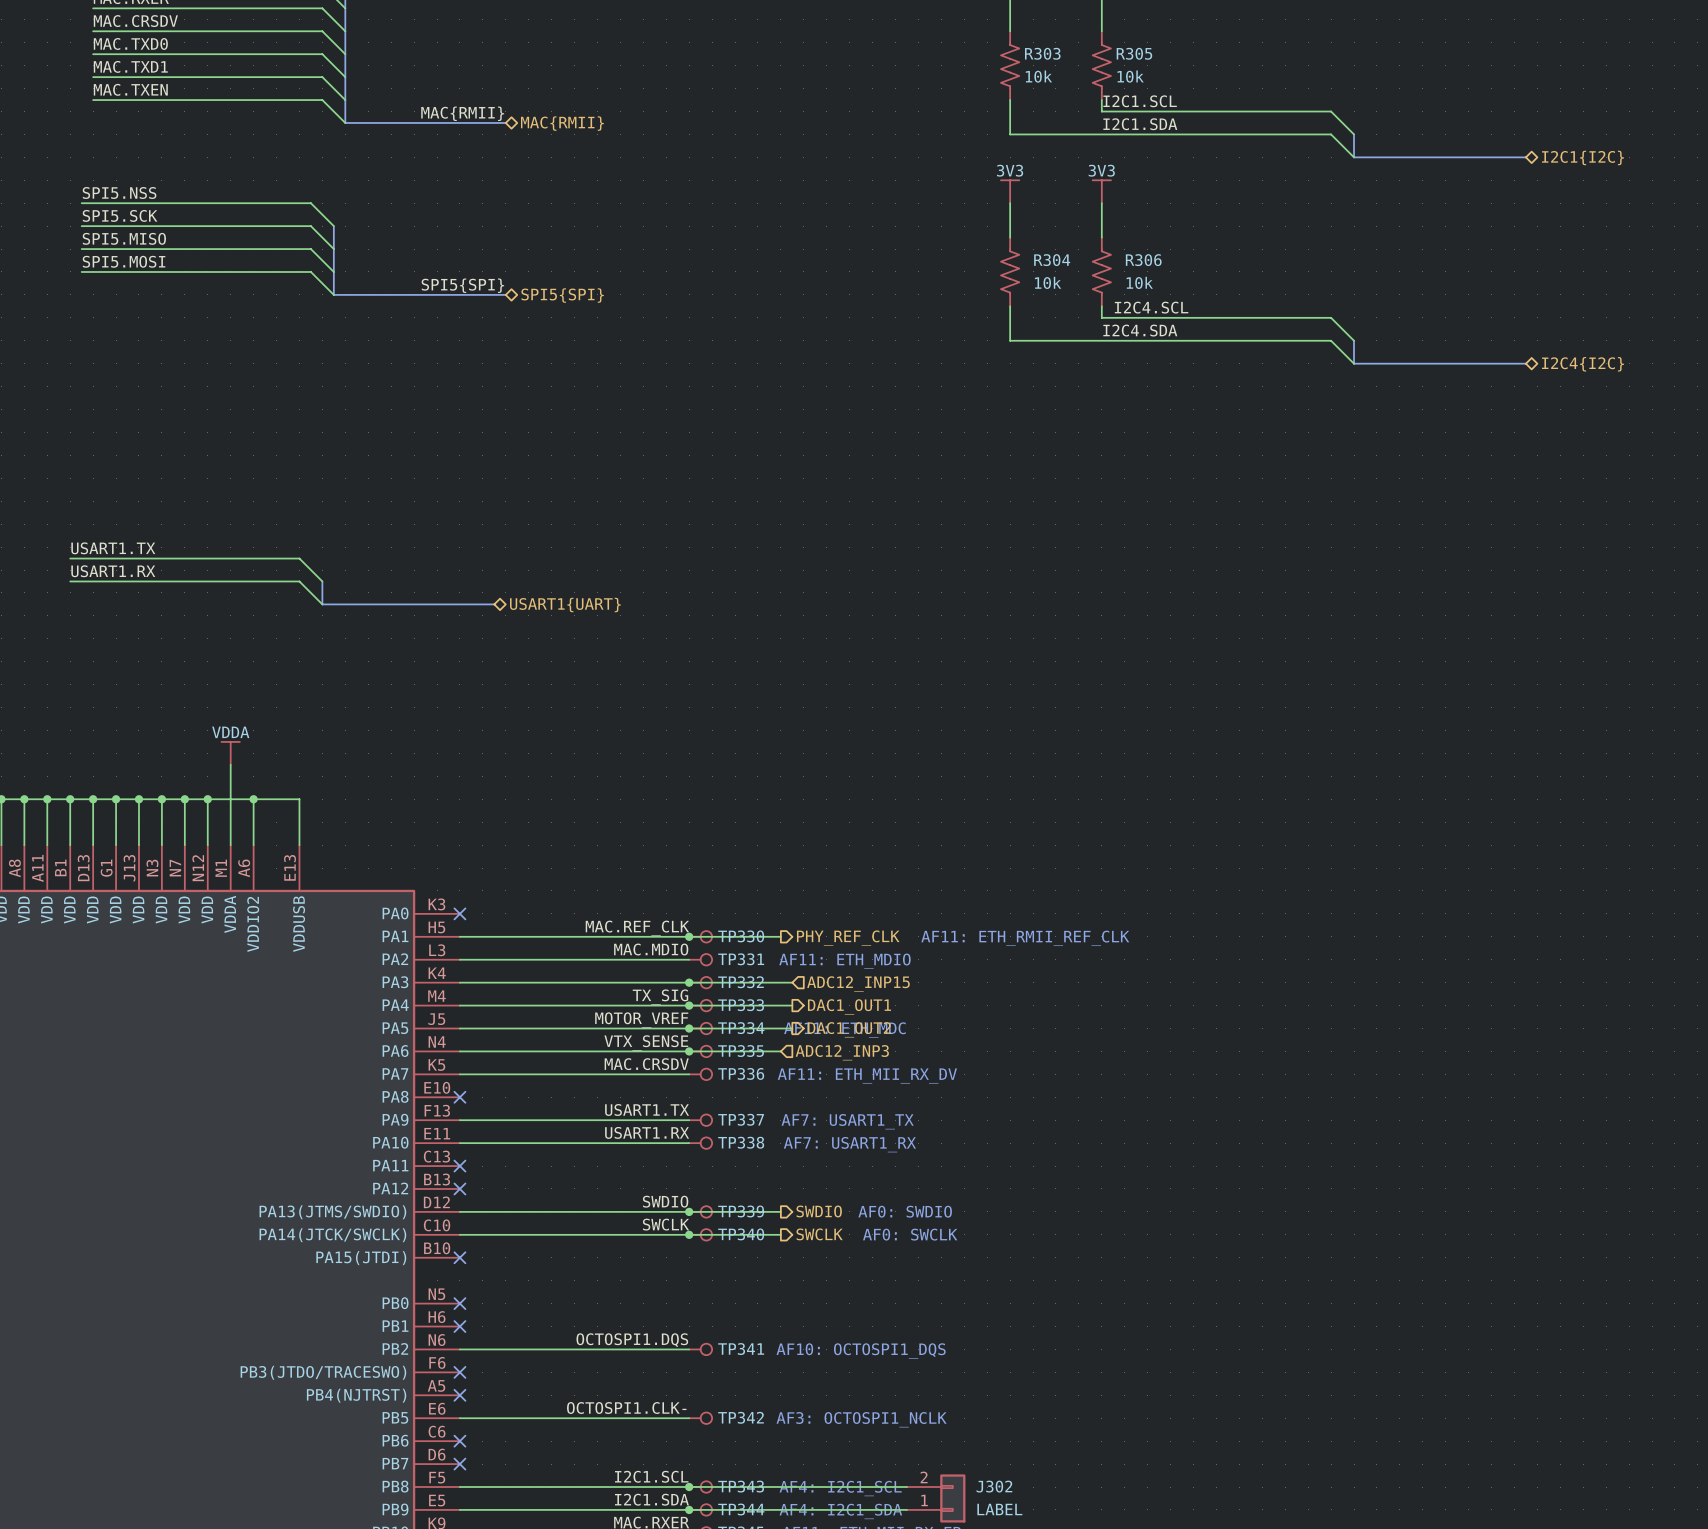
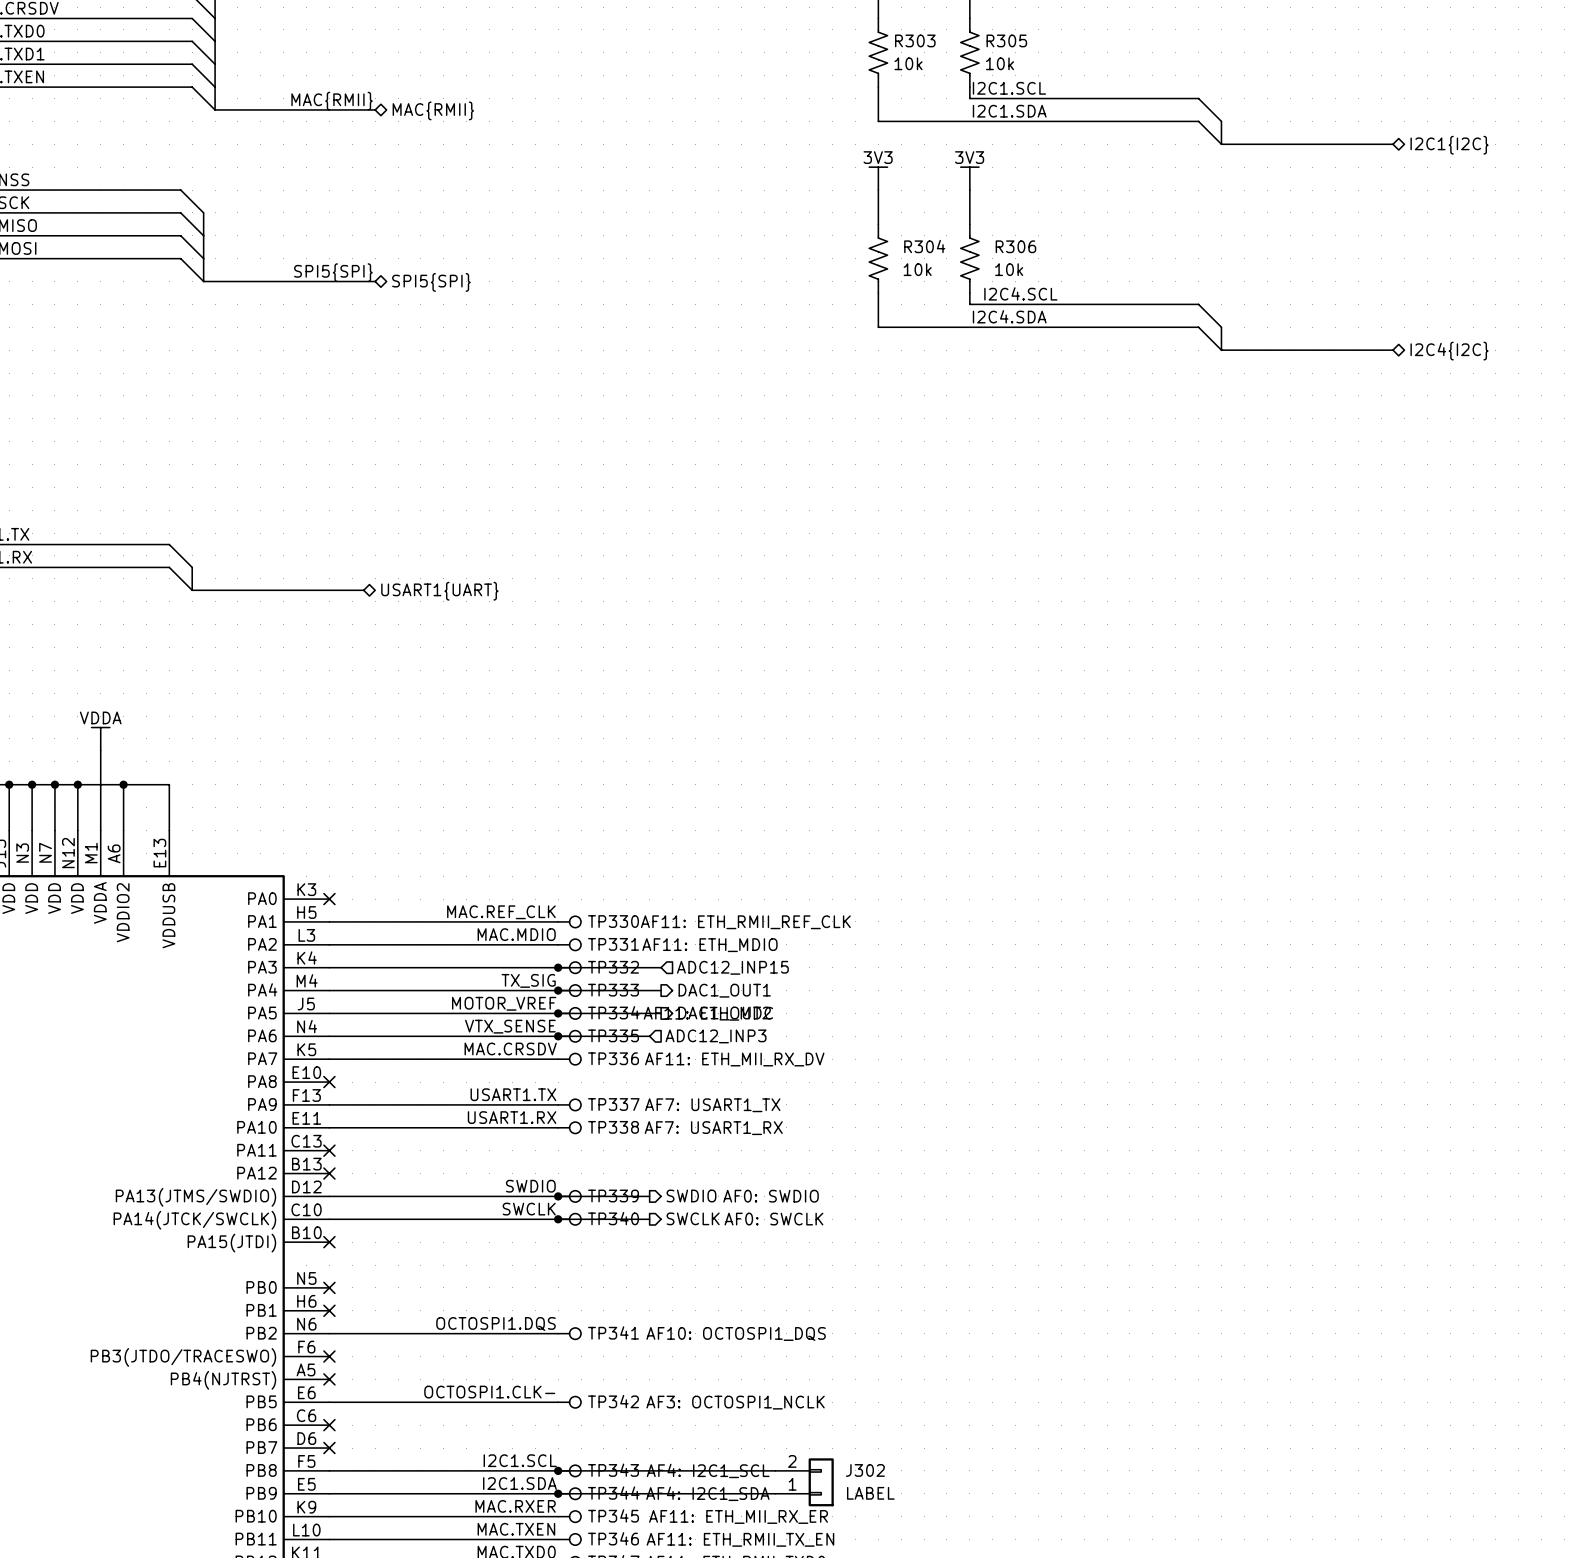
wire: (689, 936) (780, 936) -> none
junction: (689, 936) -> none
hierarchical label: PHY_REF_CLK (848, 938) -> none
text position: AF11: ETH_RMII_REF_CLK (1025, 938) -> AF11: ETH_RMII_REF_CLK (745, 922)

